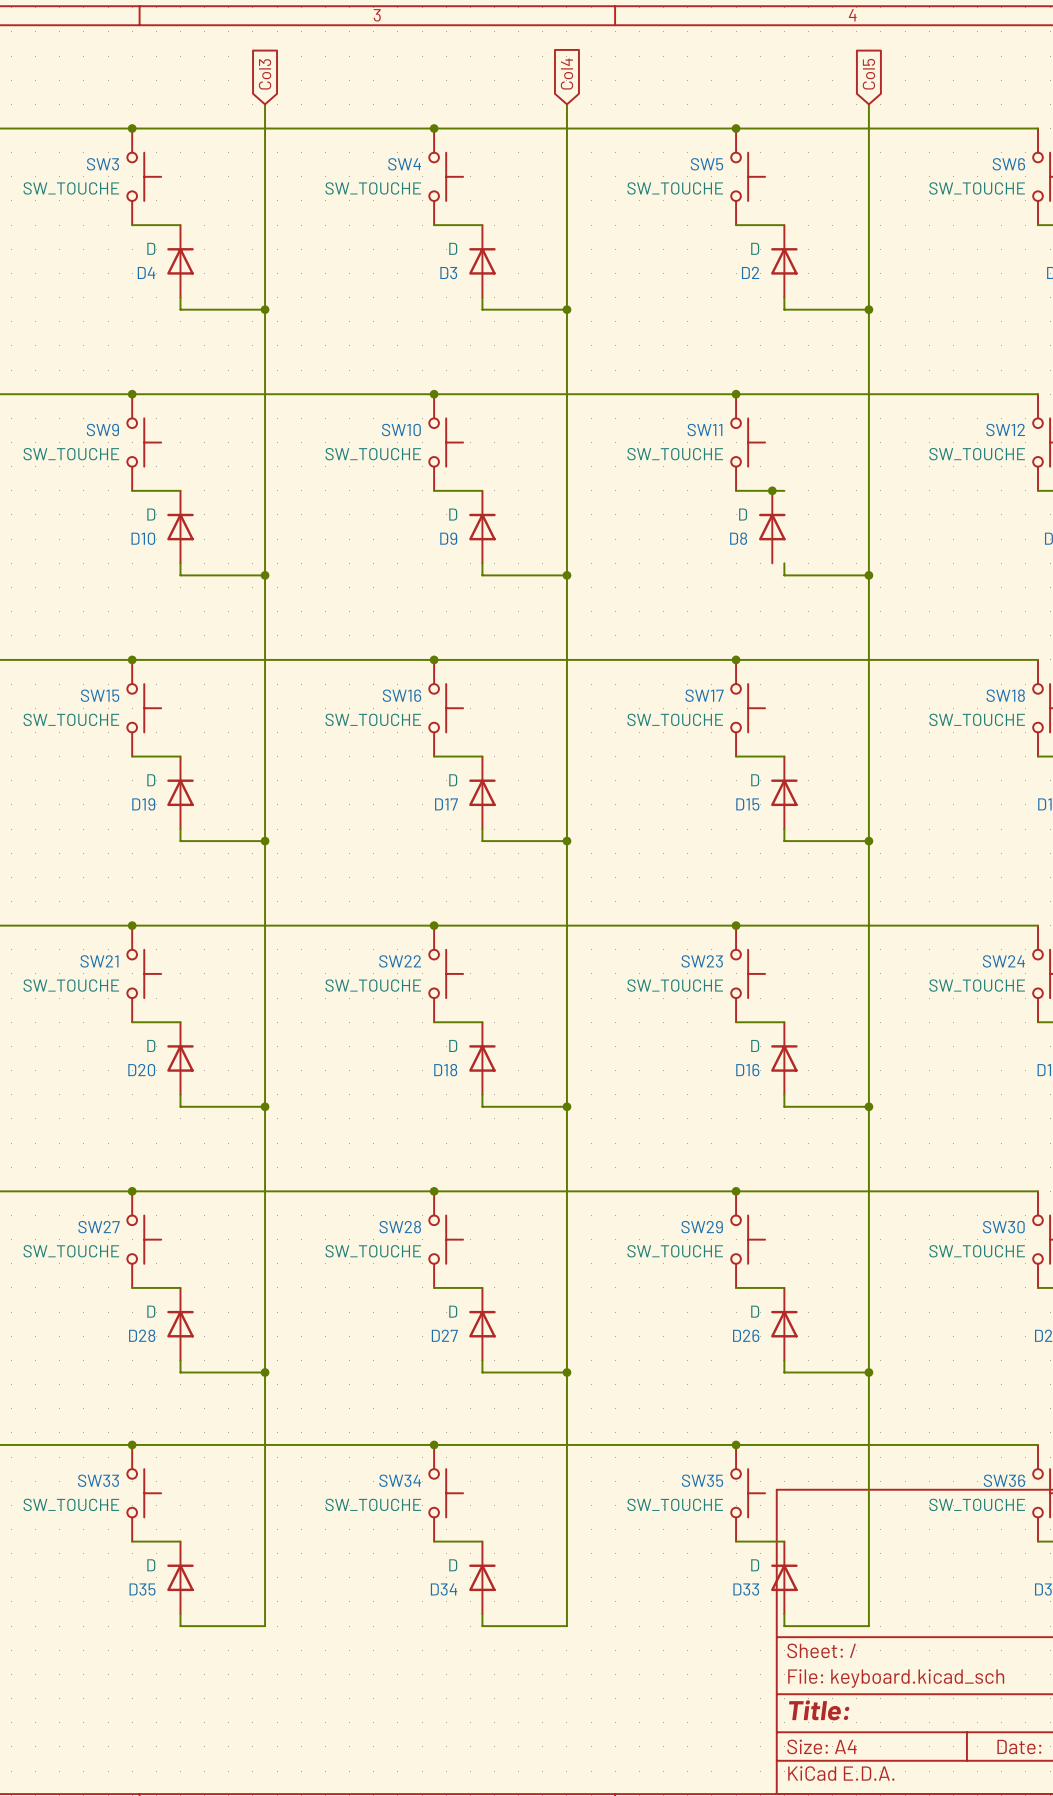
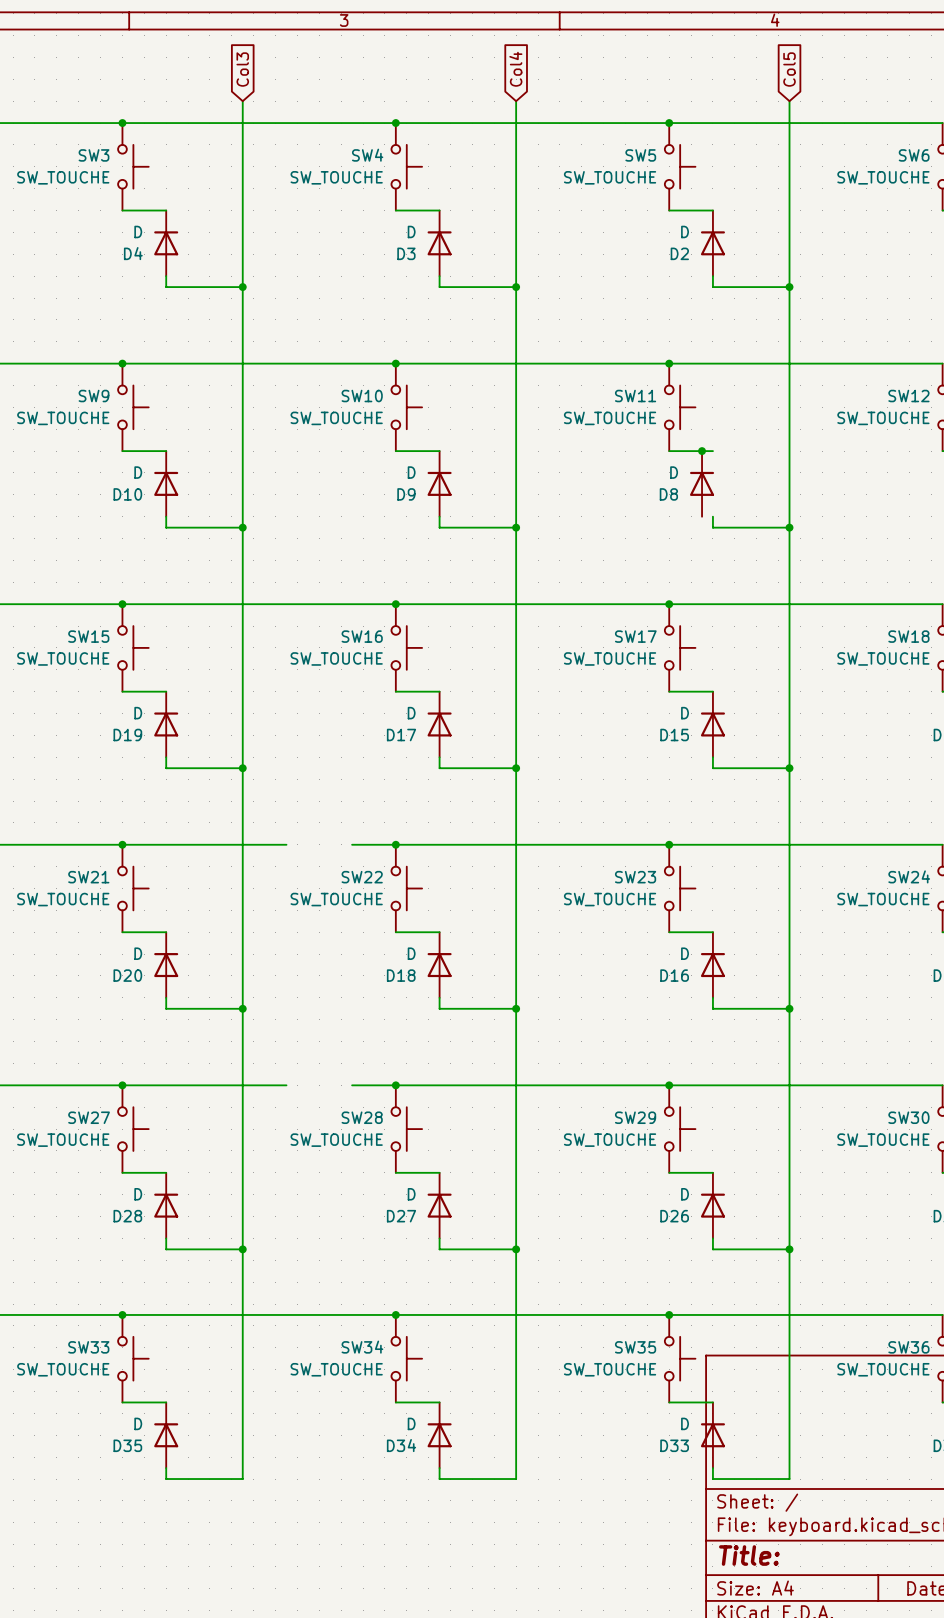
wire: (313, 925) (385, 925) -> none
wire: (313, 1191) (385, 1191) -> none

